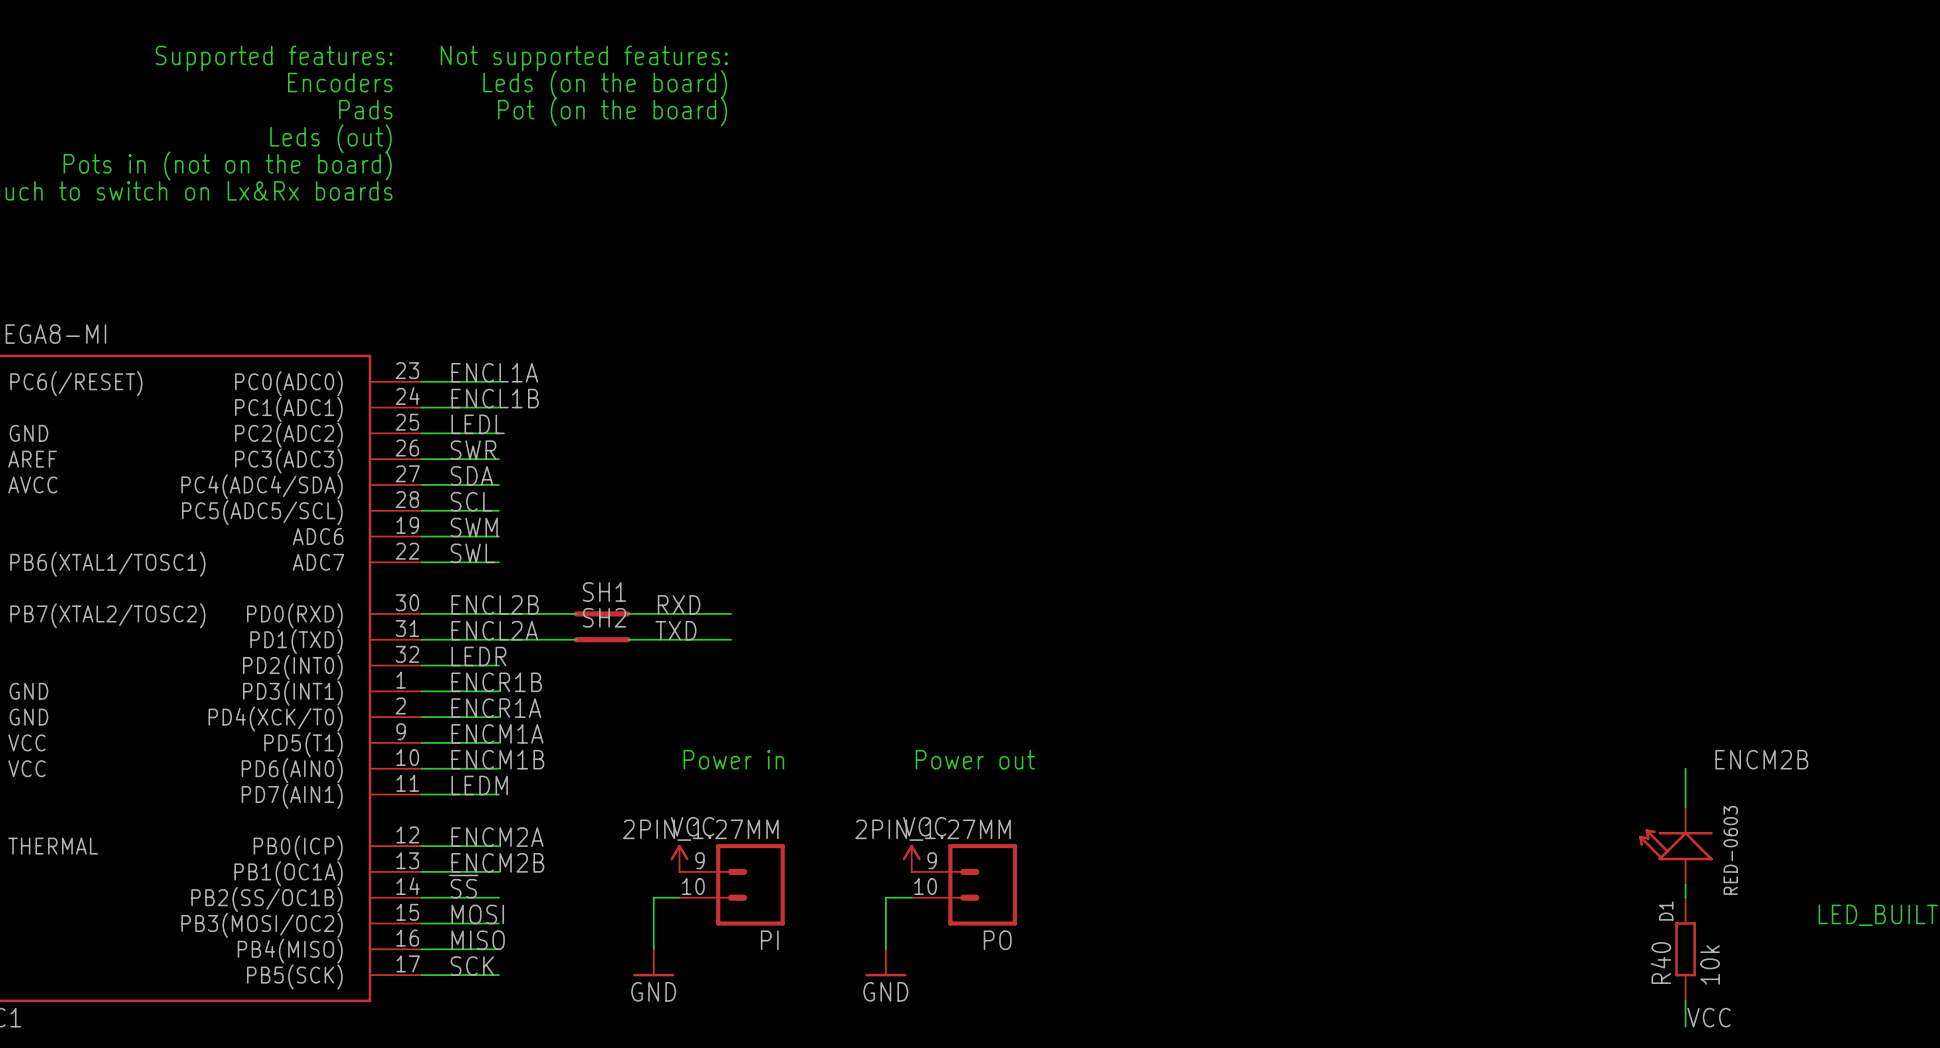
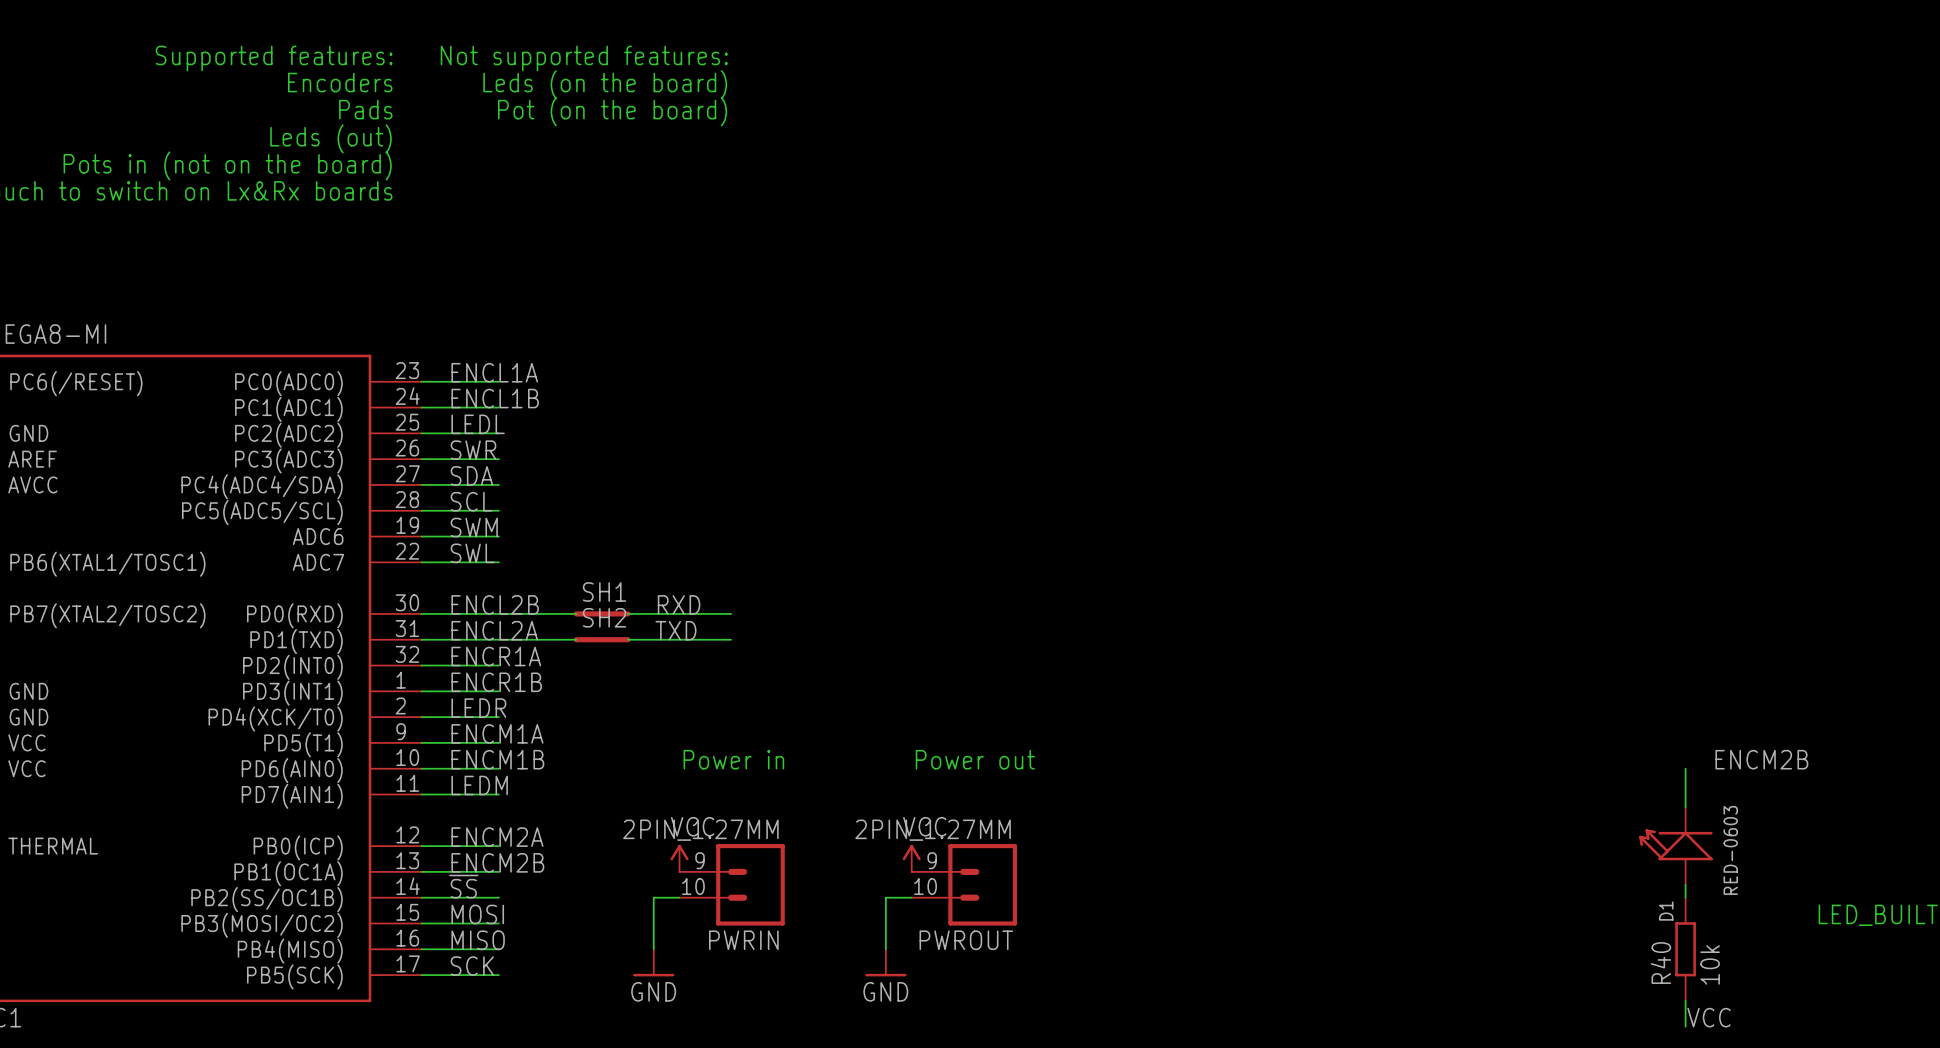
label: LEDR (478, 656) -> ENCR1A (496, 656)
label: ENCR1A (496, 708) -> LEDR (478, 708)
PI name: PI (769, 940) -> PWRIN (743, 940)
PO name: PO (997, 940) -> PWROUT (966, 940)

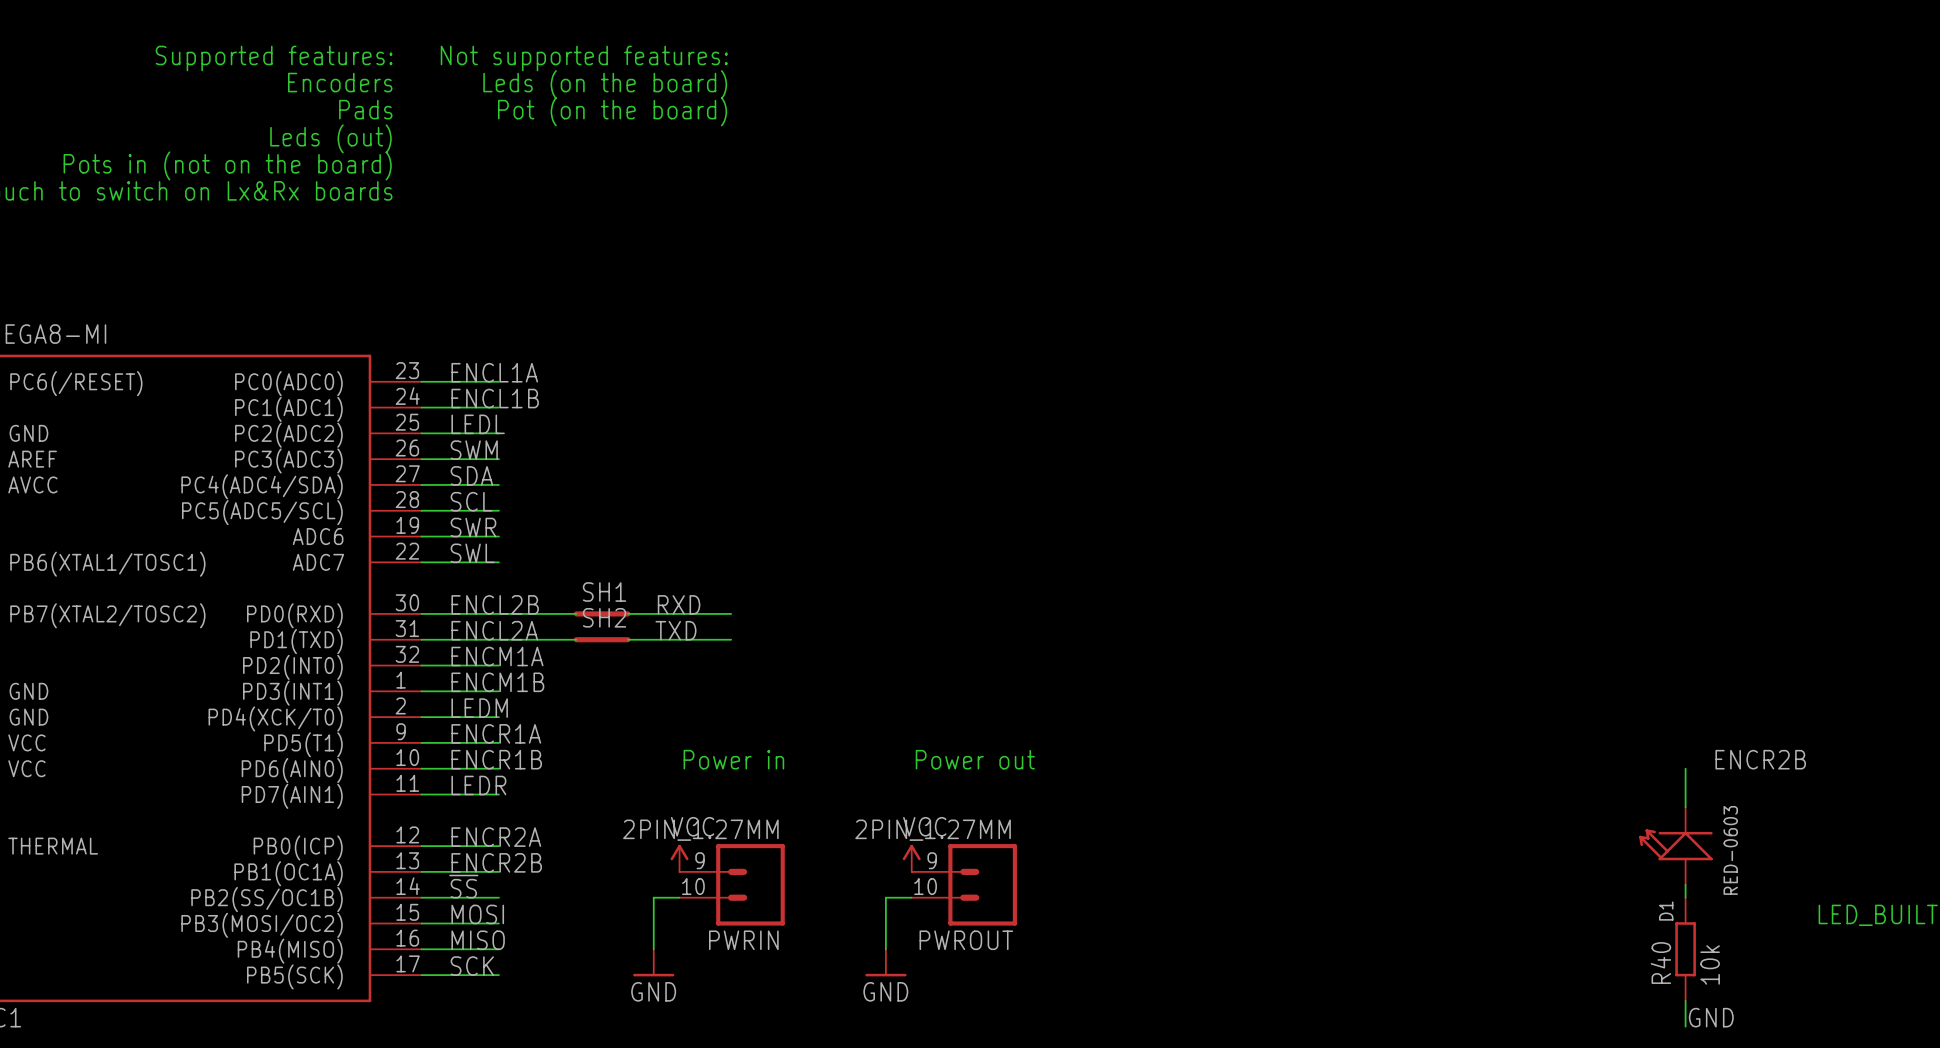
label: SWR (473, 450) -> SWM (474, 450)
label: SWM (474, 527) -> SWR (473, 527)
label: ENCR1A (496, 656) -> ENCM1A (497, 656)
label: ENCR1B (496, 682) -> ENCM1B (497, 682)
label: LEDR (478, 708) -> LEDM (479, 708)
label: ENCM1A (497, 733) -> ENCR1A (496, 733)
label: ENCM1B (497, 759) -> ENCR1B (496, 759)
label: ENCM2B (1761, 759) -> ENCR2B (1760, 759)
label: LEDM (479, 785) -> LEDR (478, 785)
label: ENCM2A (497, 837) -> ENCR2A (496, 837)
label: ENCM2B (497, 862) -> ENCR2B (496, 862)
label: VCC (1708, 1017) -> GND (1711, 1017)

